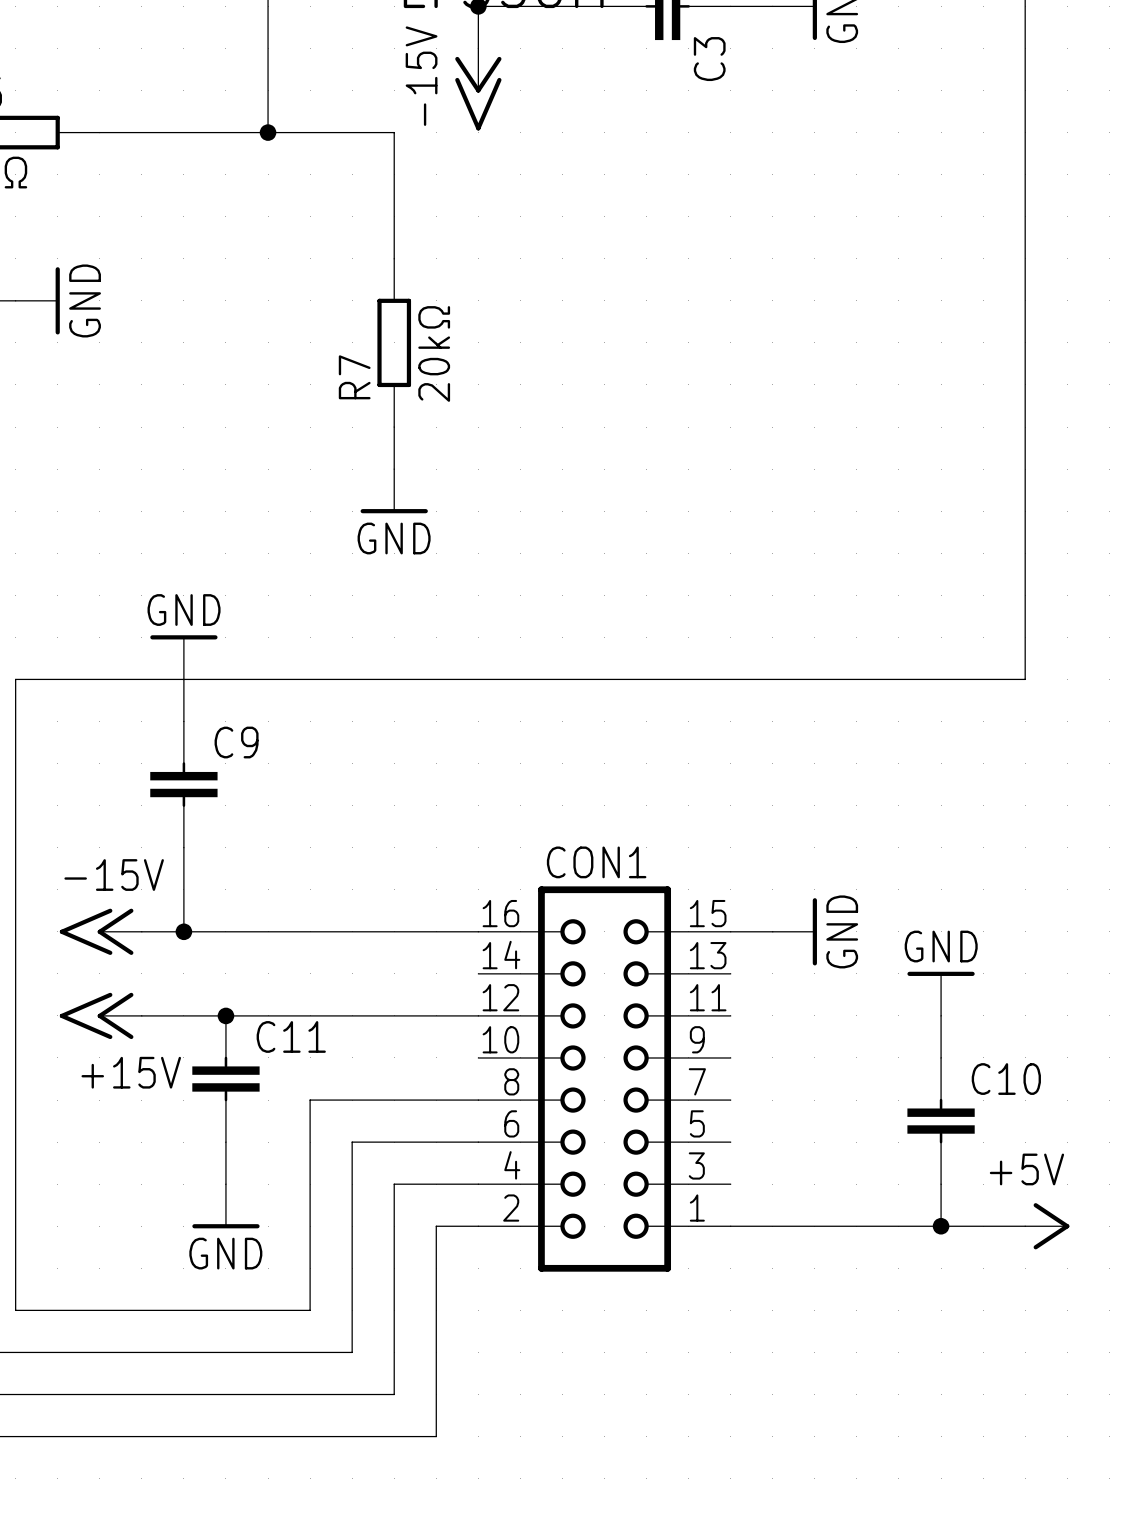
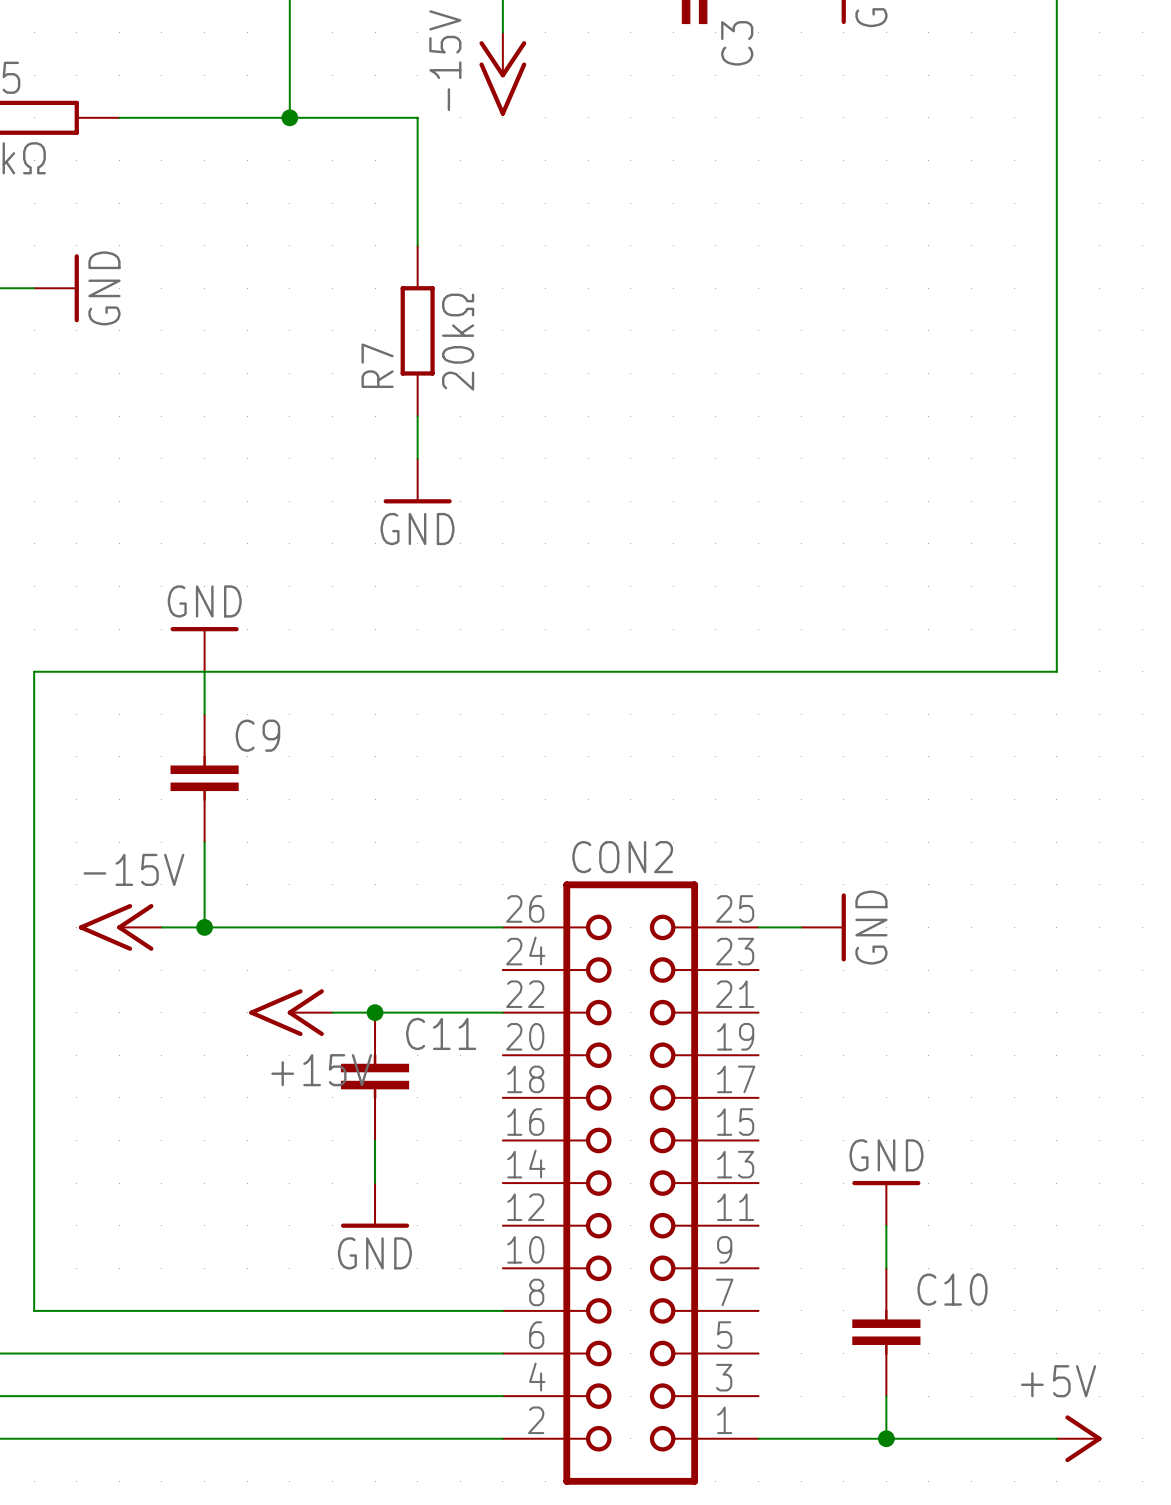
power symbol position: GND (941, 993) -> GND (886, 1203)
power symbol position: +15V (100, 1015) -> +15V (290, 1012)
wire: (141, 1015) (310, 1015) -> none
junction: (225, 1015) -> none
junction: none -> (375, 1012)
wire: (941, 1015) (941, 1057) -> (886, 1225) (886, 1268)
C11 position: (225, 1079) -> (375, 1076)
CON1: (604, 1079) -> none
wire: (478, 1100) (310, 1100) (310, 1310) -> (502, 1310) (332, 1310)
C10 position: (941, 1121) -> (886, 1332)
wire: (225, 1142) (225, 1184) -> none
wire: (352, 1142) (478, 1142) -> none
wire: (352, 1184) (352, 1352) -> (502, 1353) (375, 1353)
wire: (478, 1184) (394, 1184) (394, 1394) -> (502, 1396) (417, 1396)
CON2: none -> (630, 1183)
wire: (941, 1184) (941, 1226) -> (886, 1396) (886, 1438)
power symbol position: GND (225, 1206) -> GND (375, 1205)
wire: (478, 1226) (436, 1226) (436, 1436) -> (502, 1438) (460, 1438)
wire: (730, 1226) (1025, 1226) -> (758, 1438) (1056, 1438)
junction: (941, 1226) -> none
power symbol position: +5V (1047, 1226) -> +5V (1079, 1438)
junction: none -> (886, 1438)

